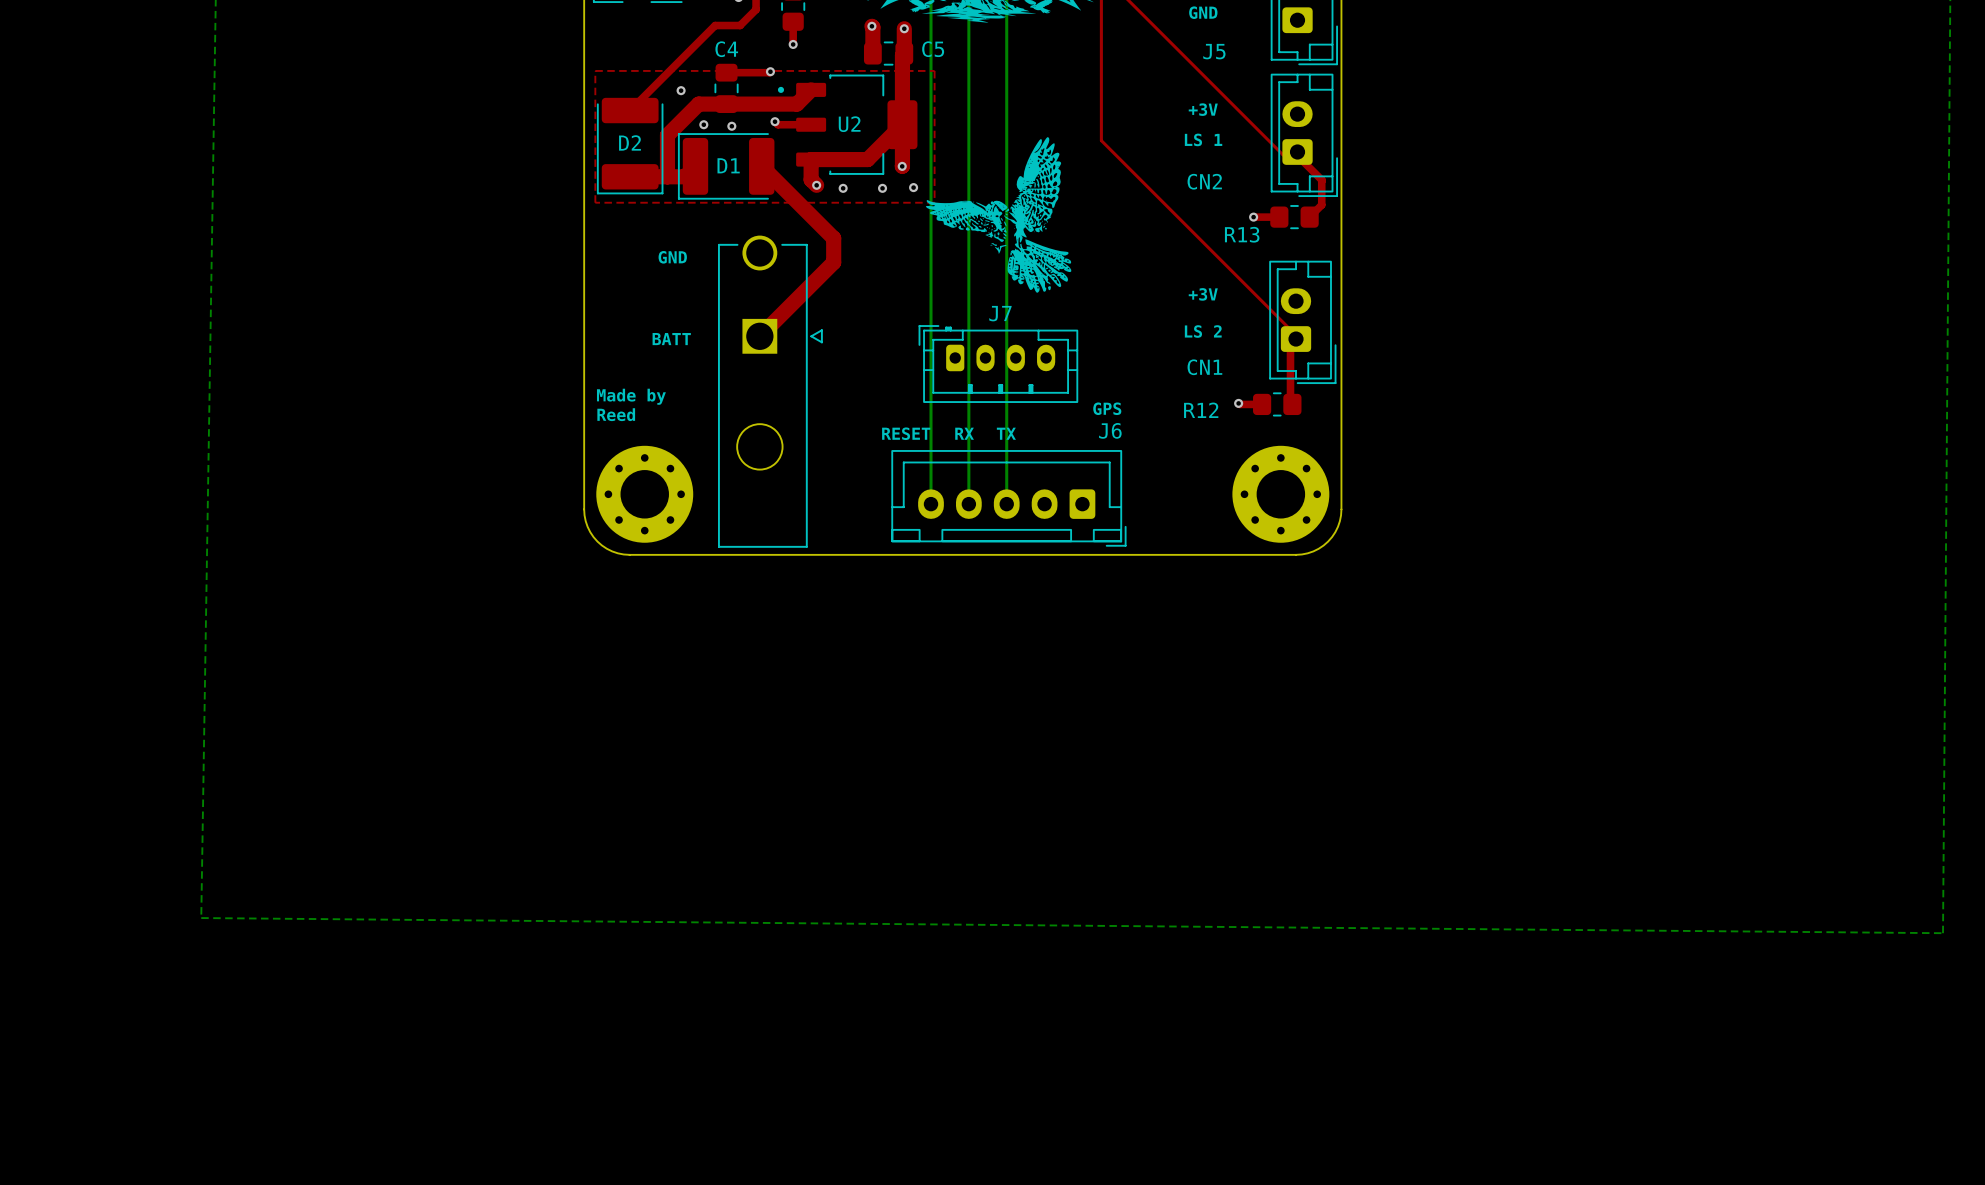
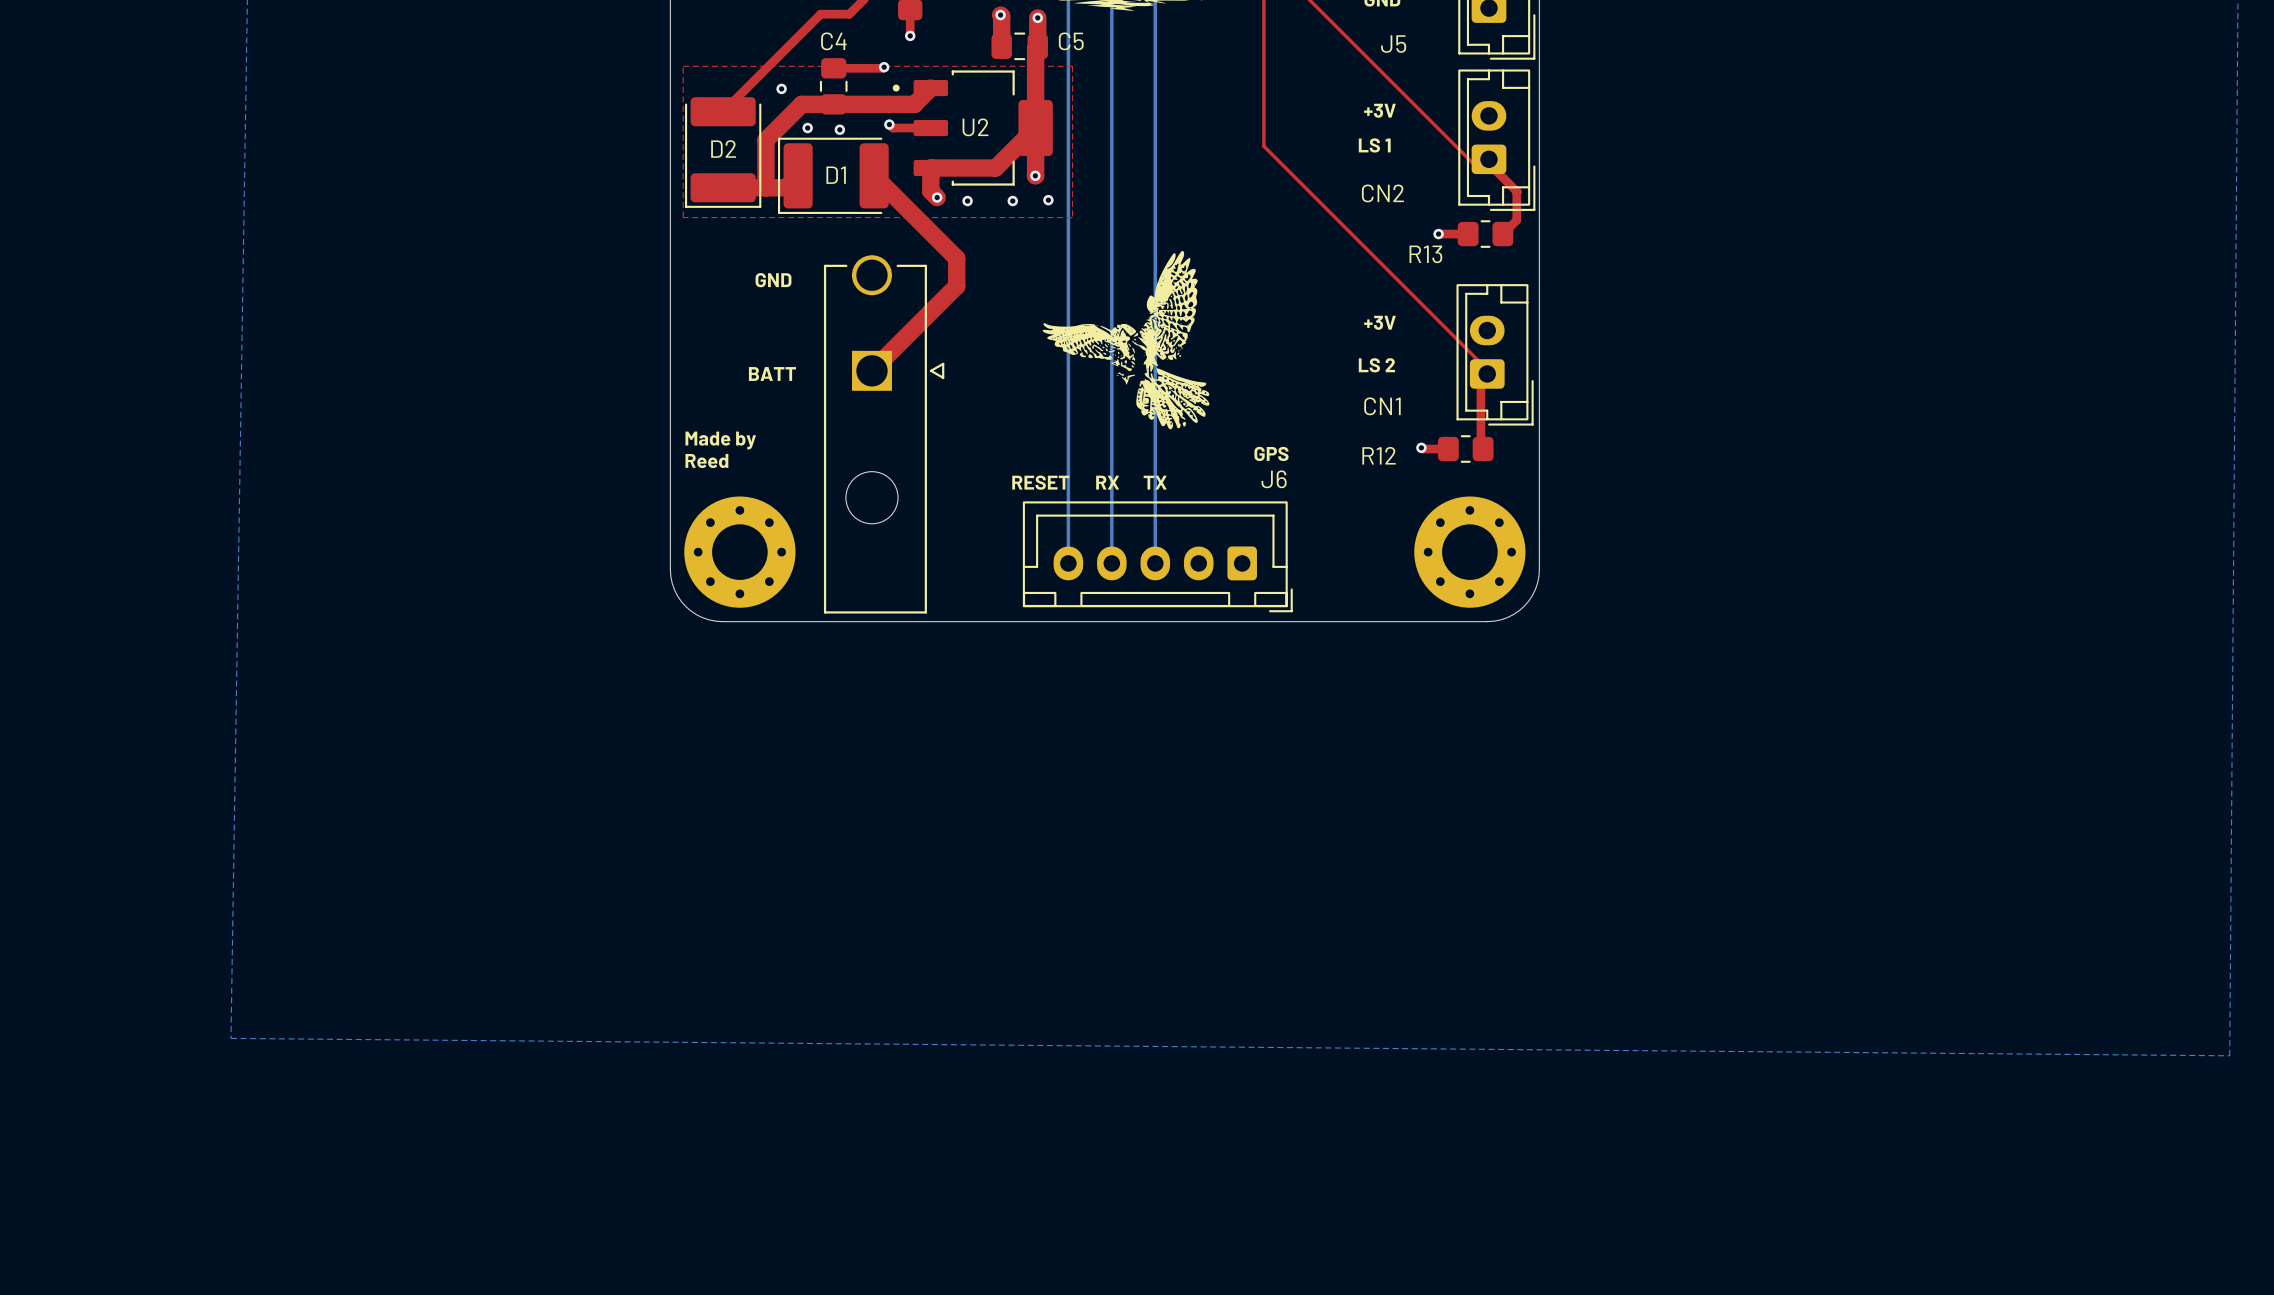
drawing position: (998, 214) -> (1125, 340)
J7: (998, 364) -> none

